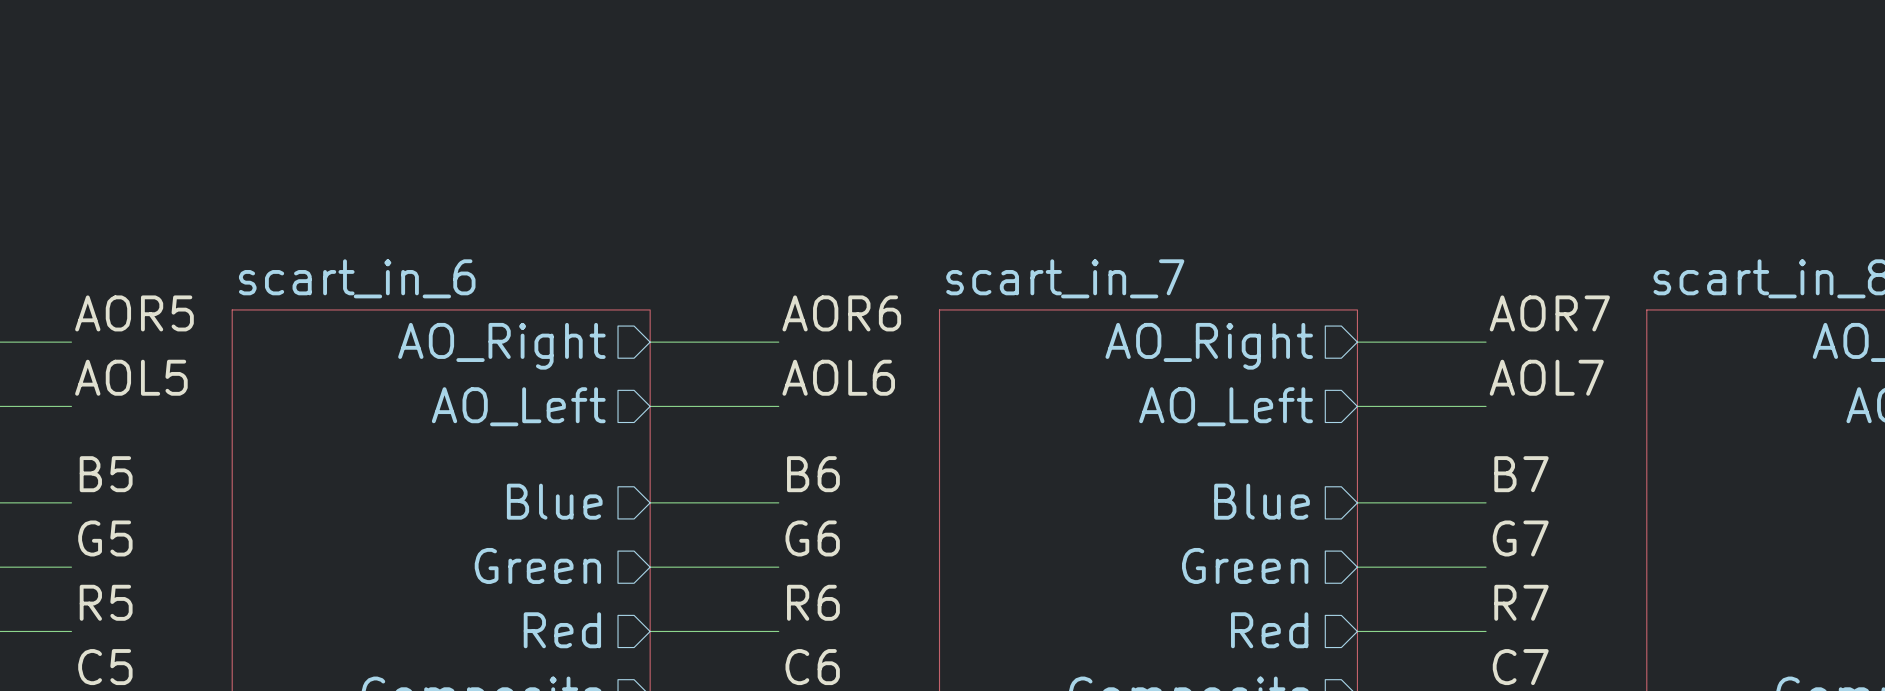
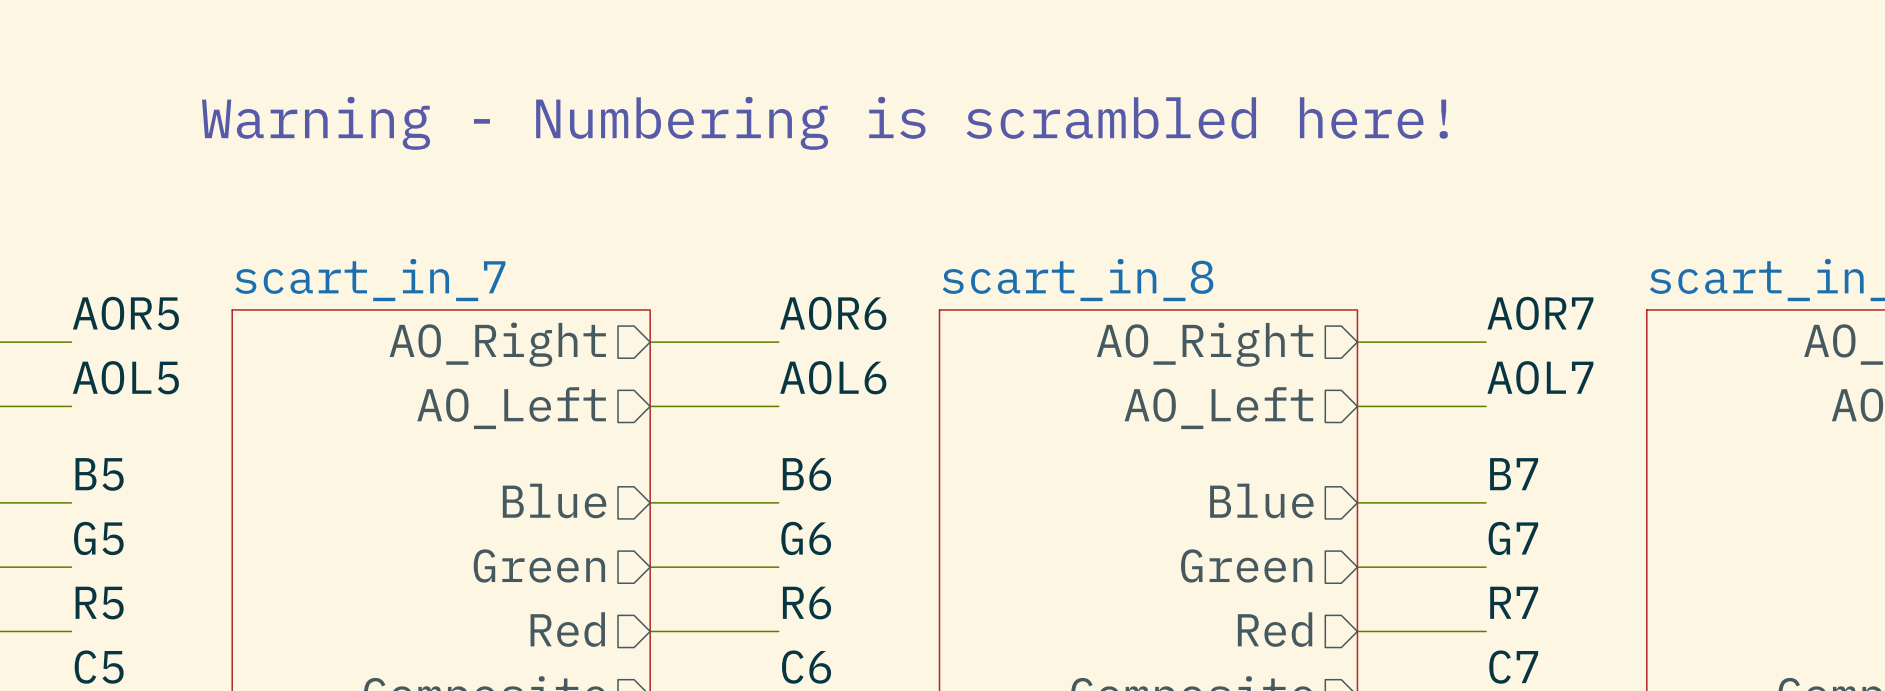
text: none -> Warning - Numbering is scrambled here! (824, 123)
sheet scart_in_6 name: scart_in_6 (357, 278) -> scart_in_7 (370, 280)
sheet scart_in_7 name: scart_in_7 (1065, 278) -> scart_in_8 (1077, 280)

